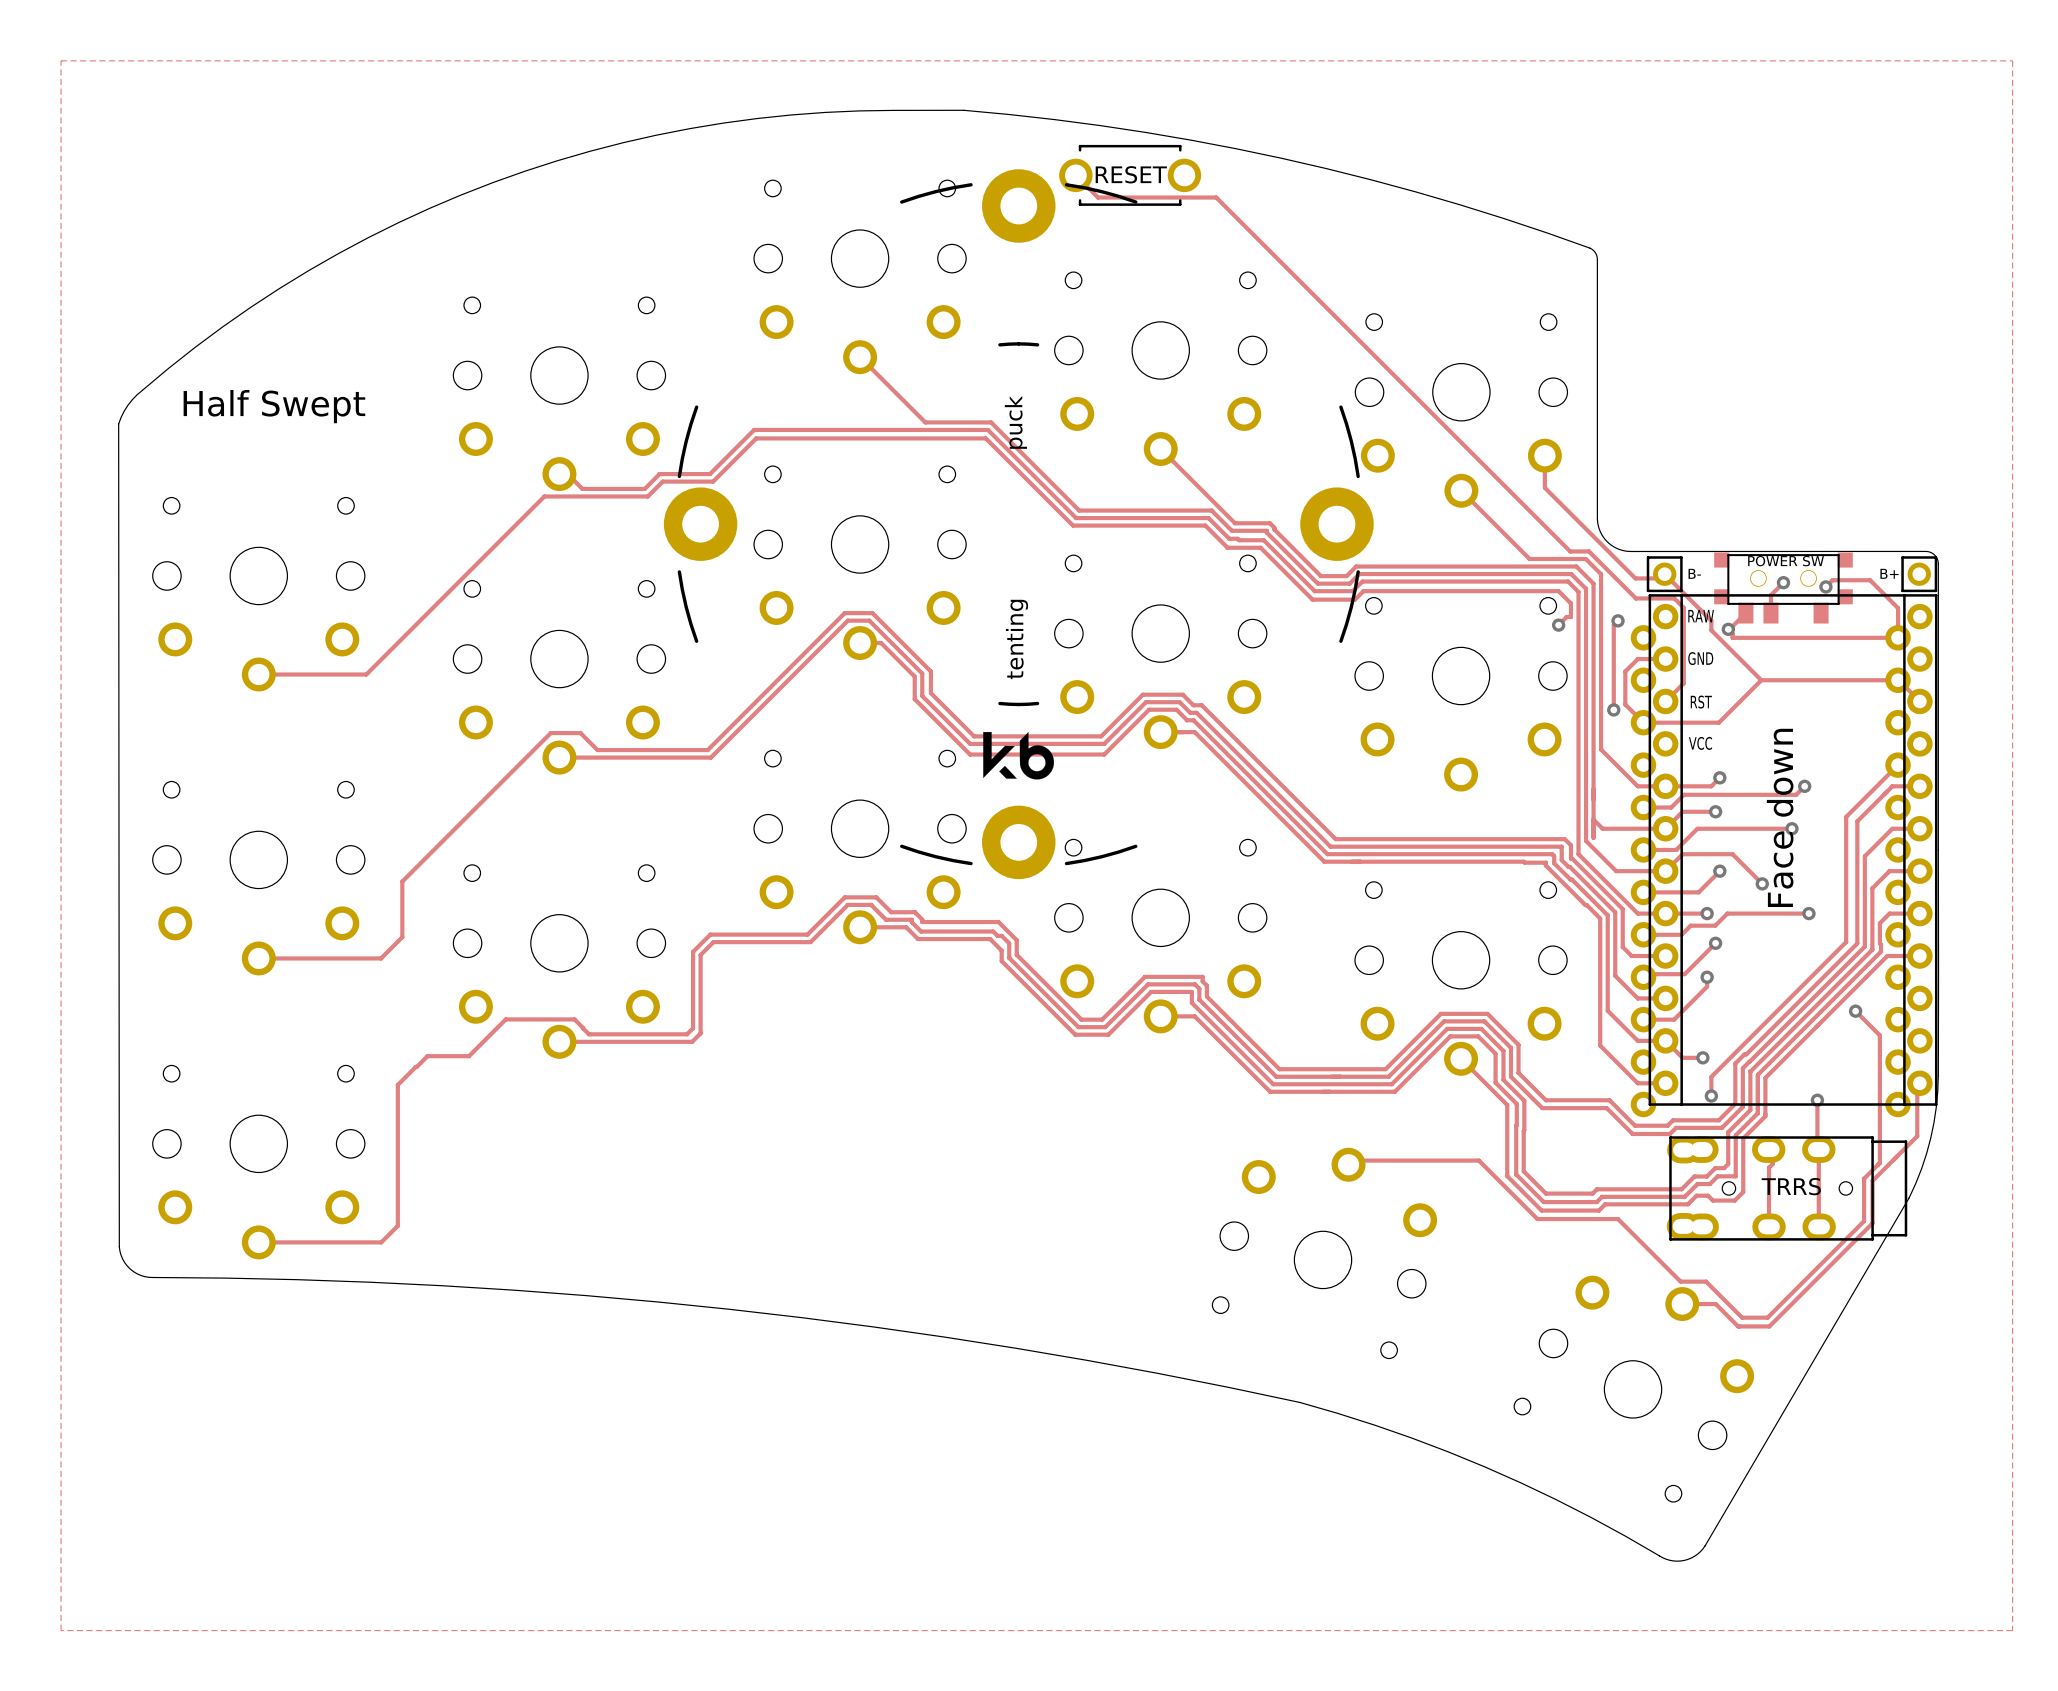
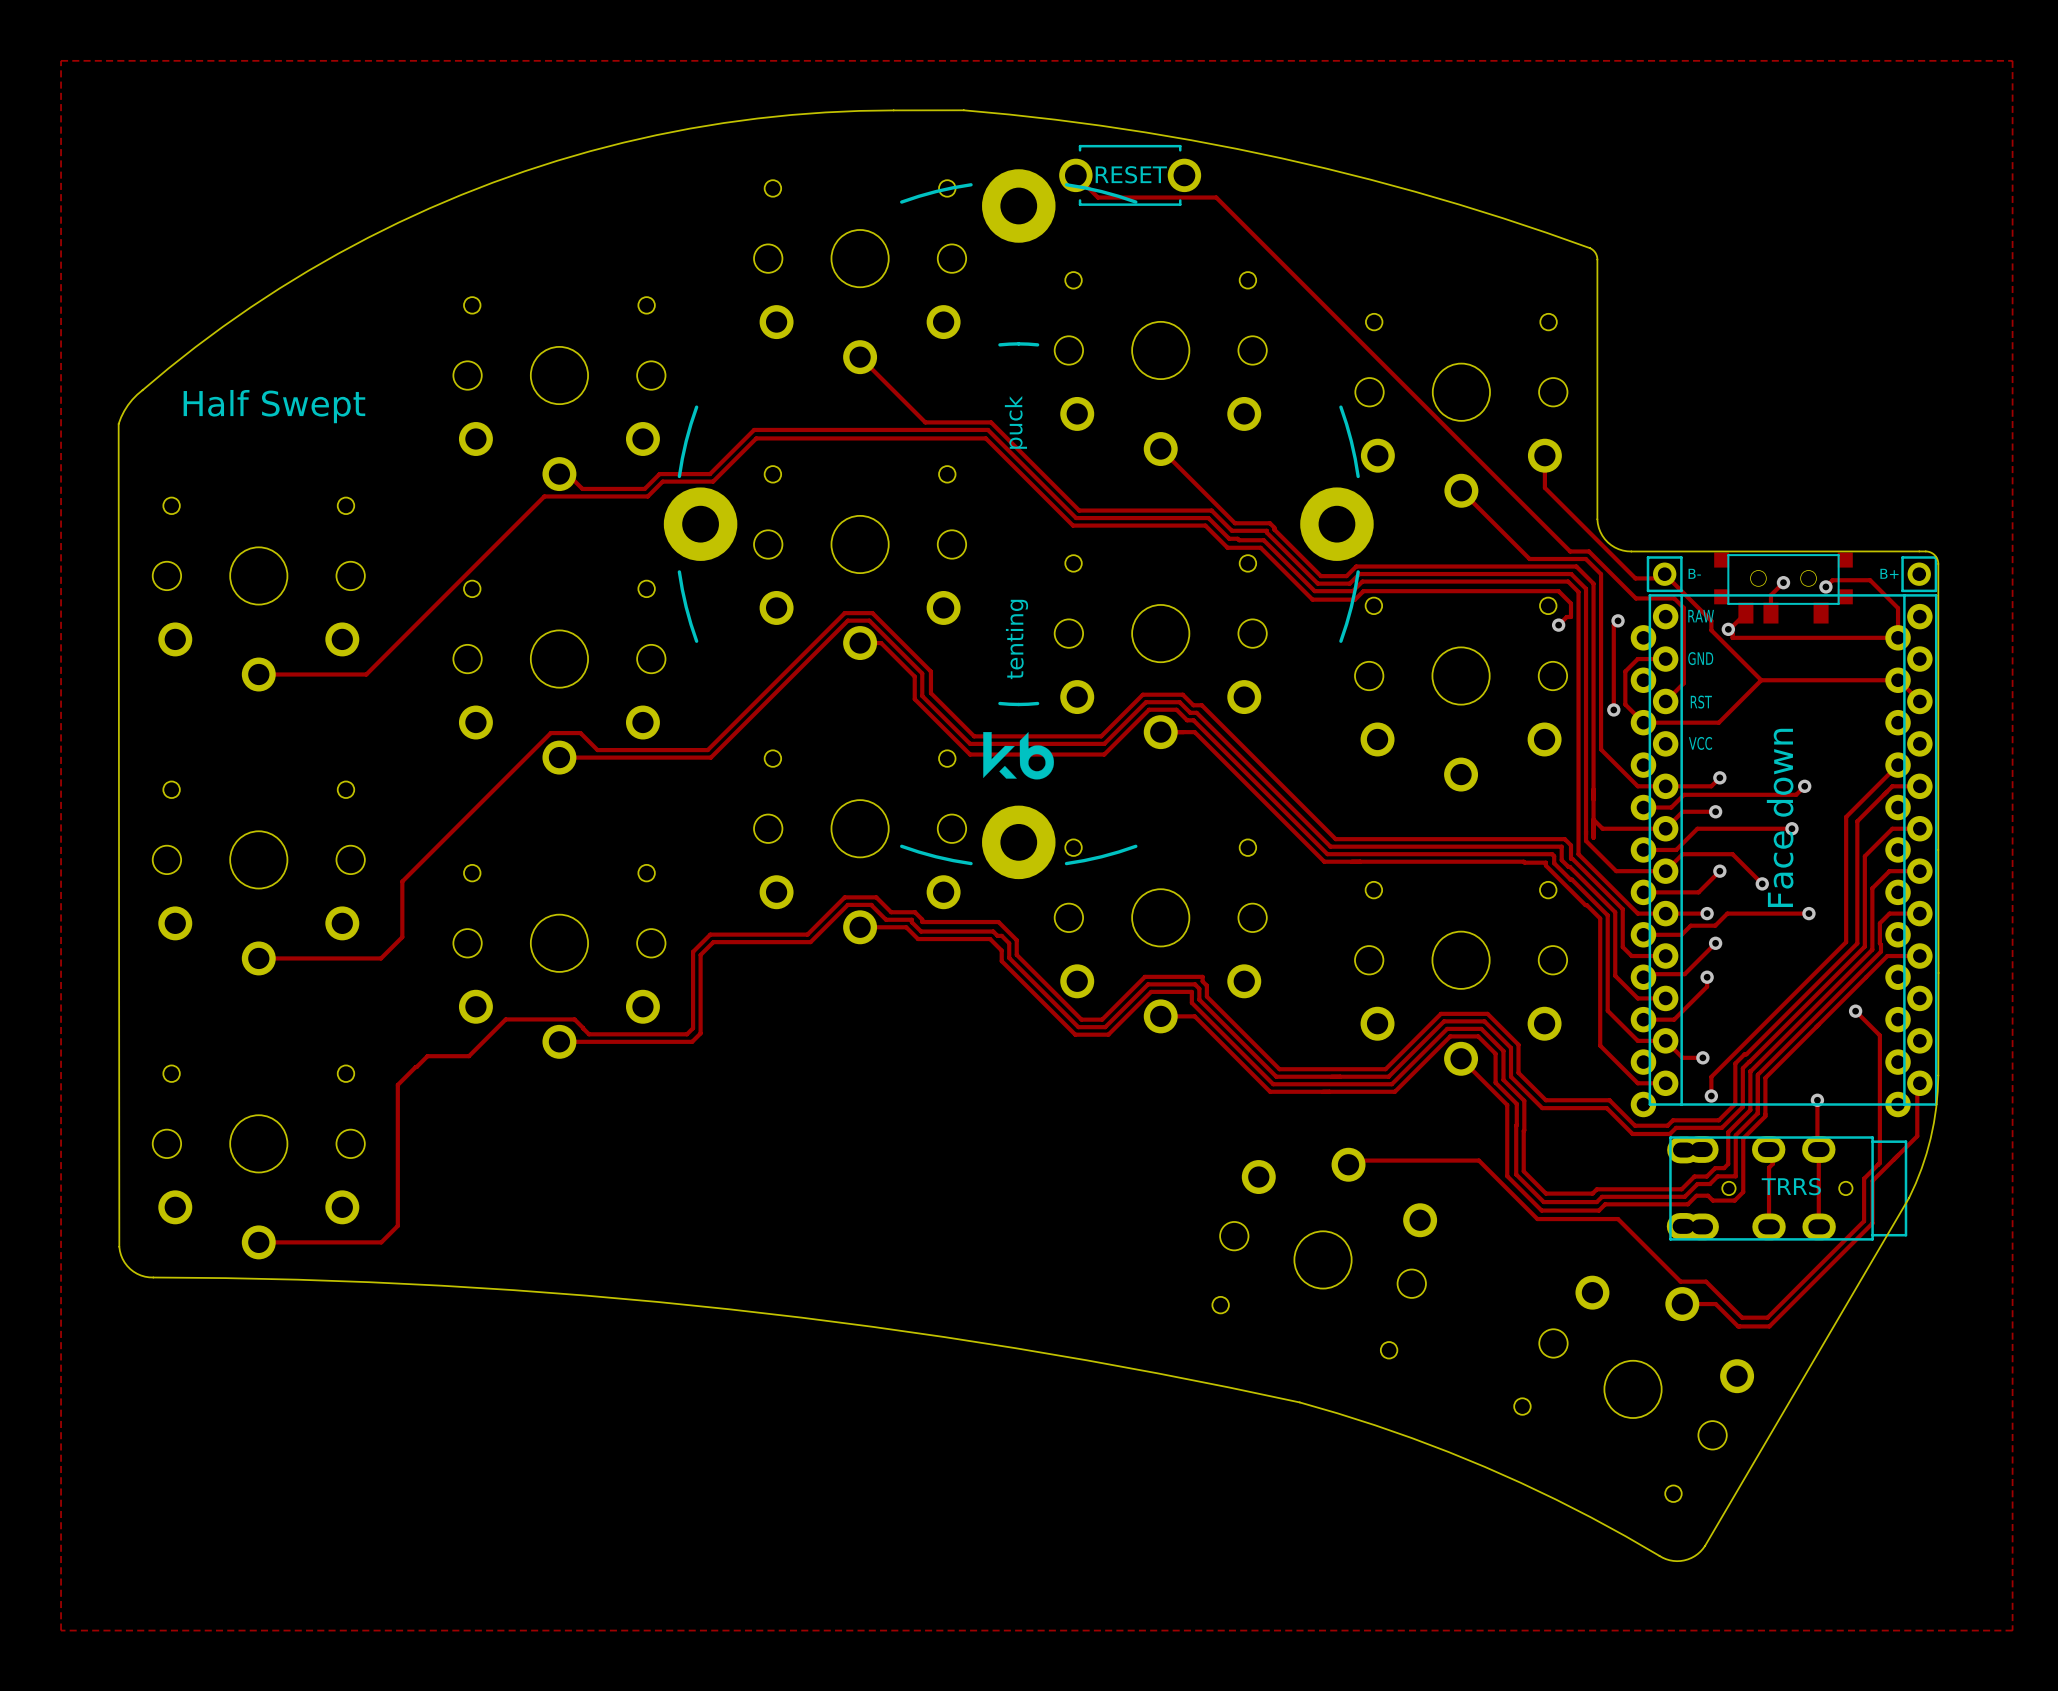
text: POWER SW (1786, 561) -> none

